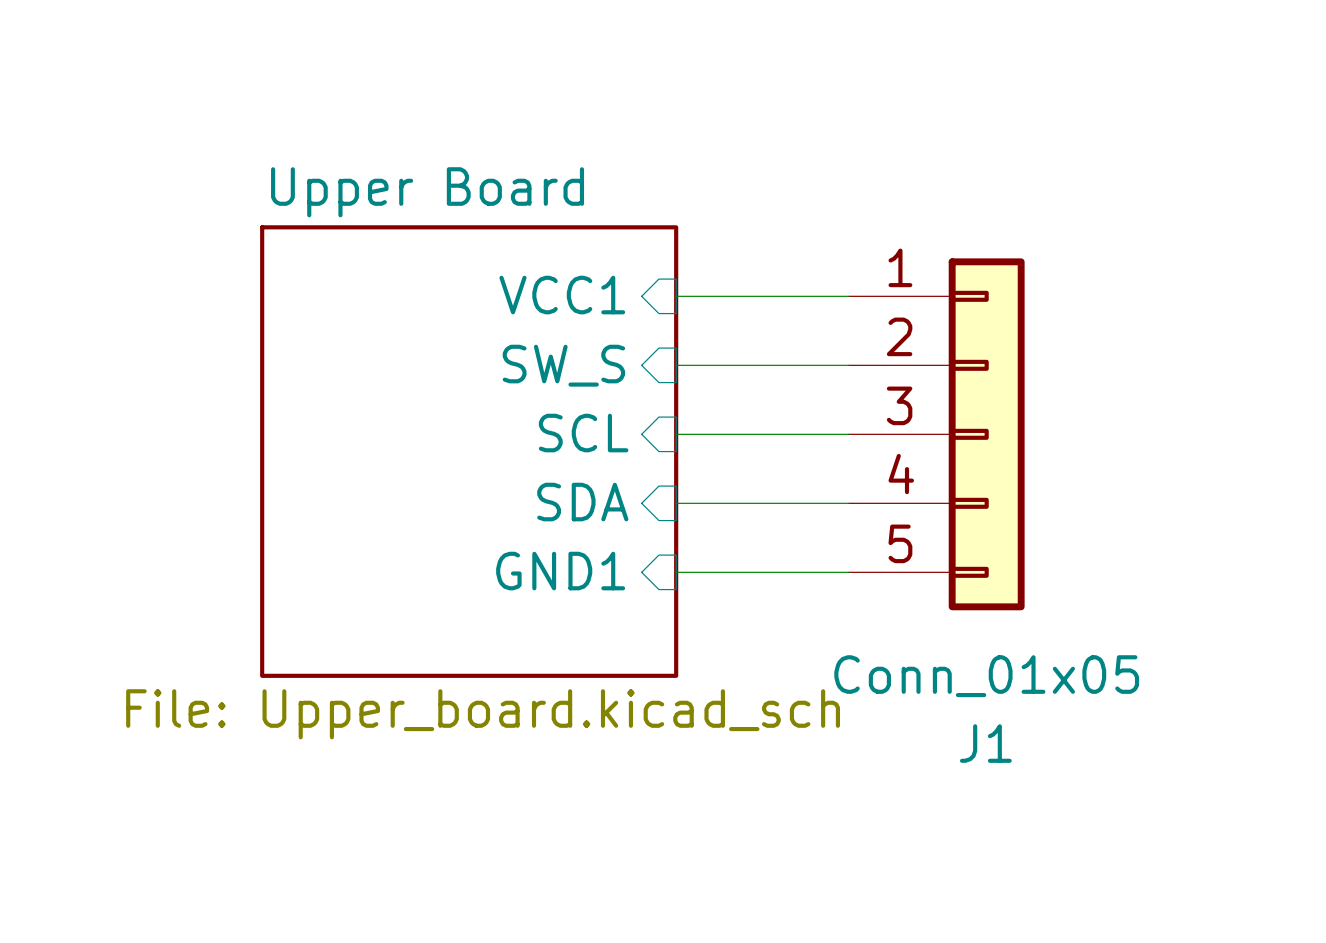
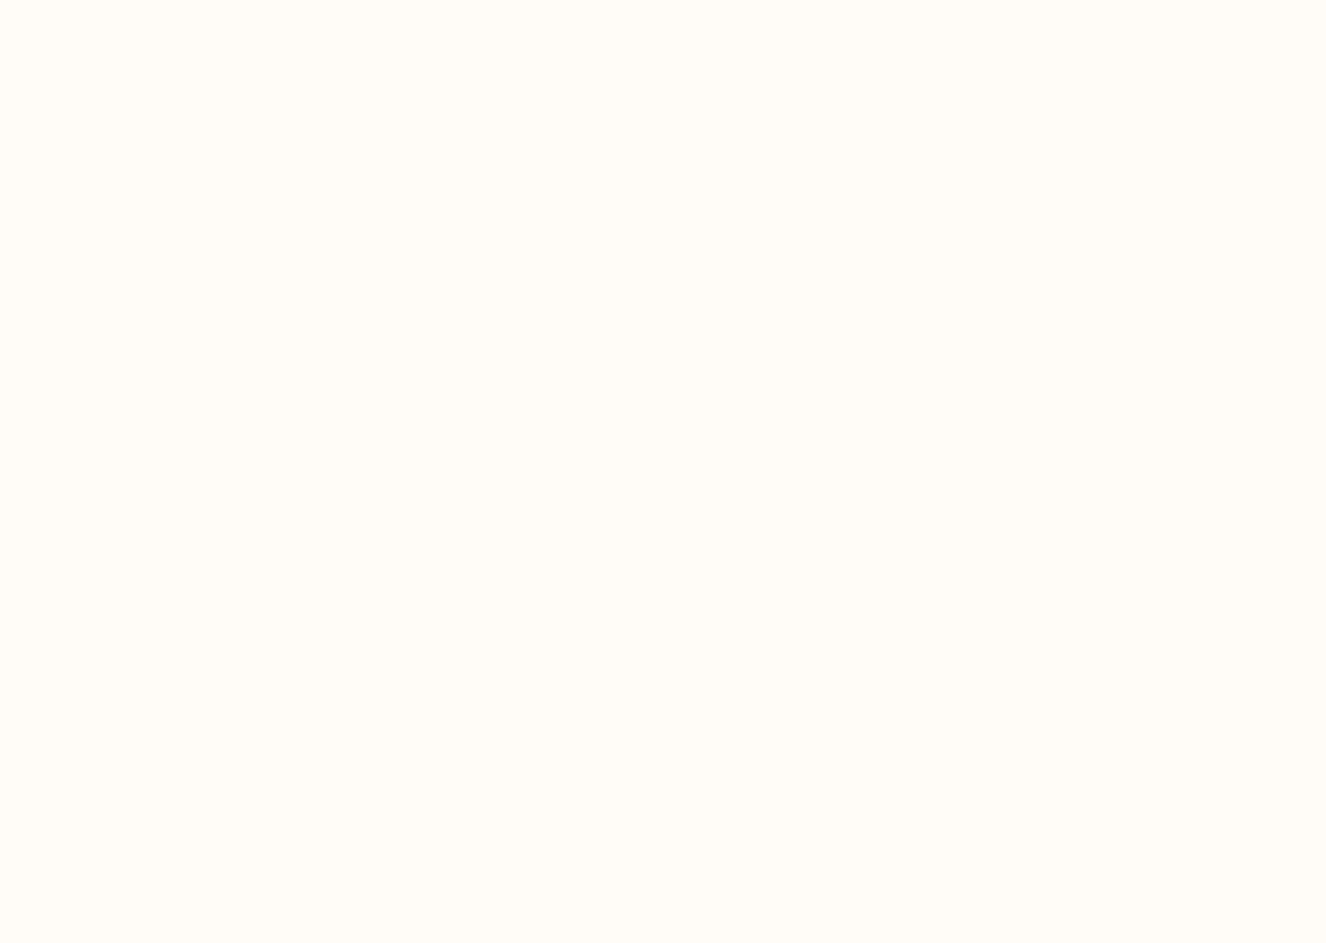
sheet pin: VCC1 (562, 295) -> none
wire: (676, 296) (848, 296) -> none
sheet pin: SW_S (563, 365) -> none
wire: (676, 365) (848, 365) -> none
sheet pin: SCL (583, 433) -> none
wire: (676, 434) (848, 434) -> none
J1: Conn_01x05 (936, 434) -> none
sheet Upper Board: File: Upper_board.kicad_sch (469, 451) -> none
sheet pin: SDA (582, 502) -> none
wire: (676, 503) (848, 503) -> none
sheet pin: GND1 (560, 571) -> none
wire: (676, 572) (848, 572) -> none

